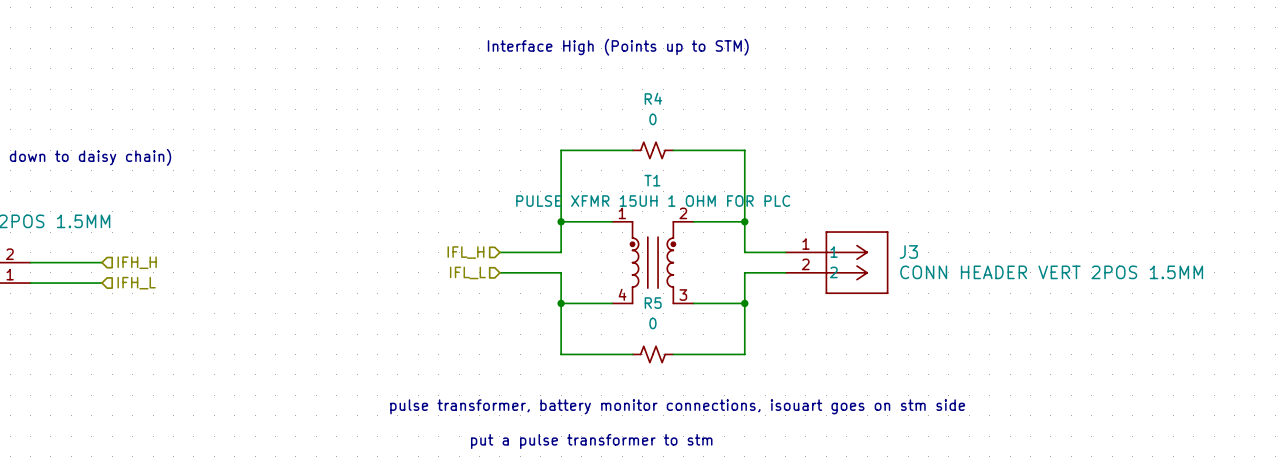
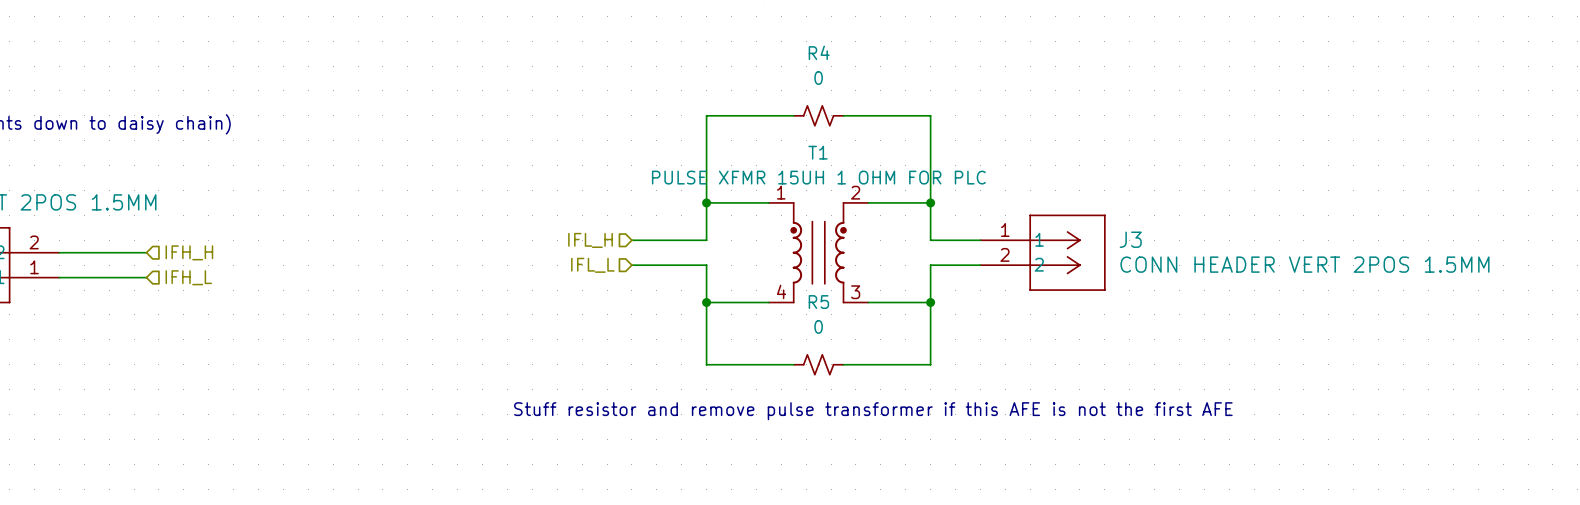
text: none -> Stuff resistor and remove pulse transformer if this AFE is not the first AFE (873, 411)
text: pulse transformer, battery monitor connections, isouart goes on stm side (677, 406) -> none
text: put a pulse transformer to stm (591, 441) -> none

